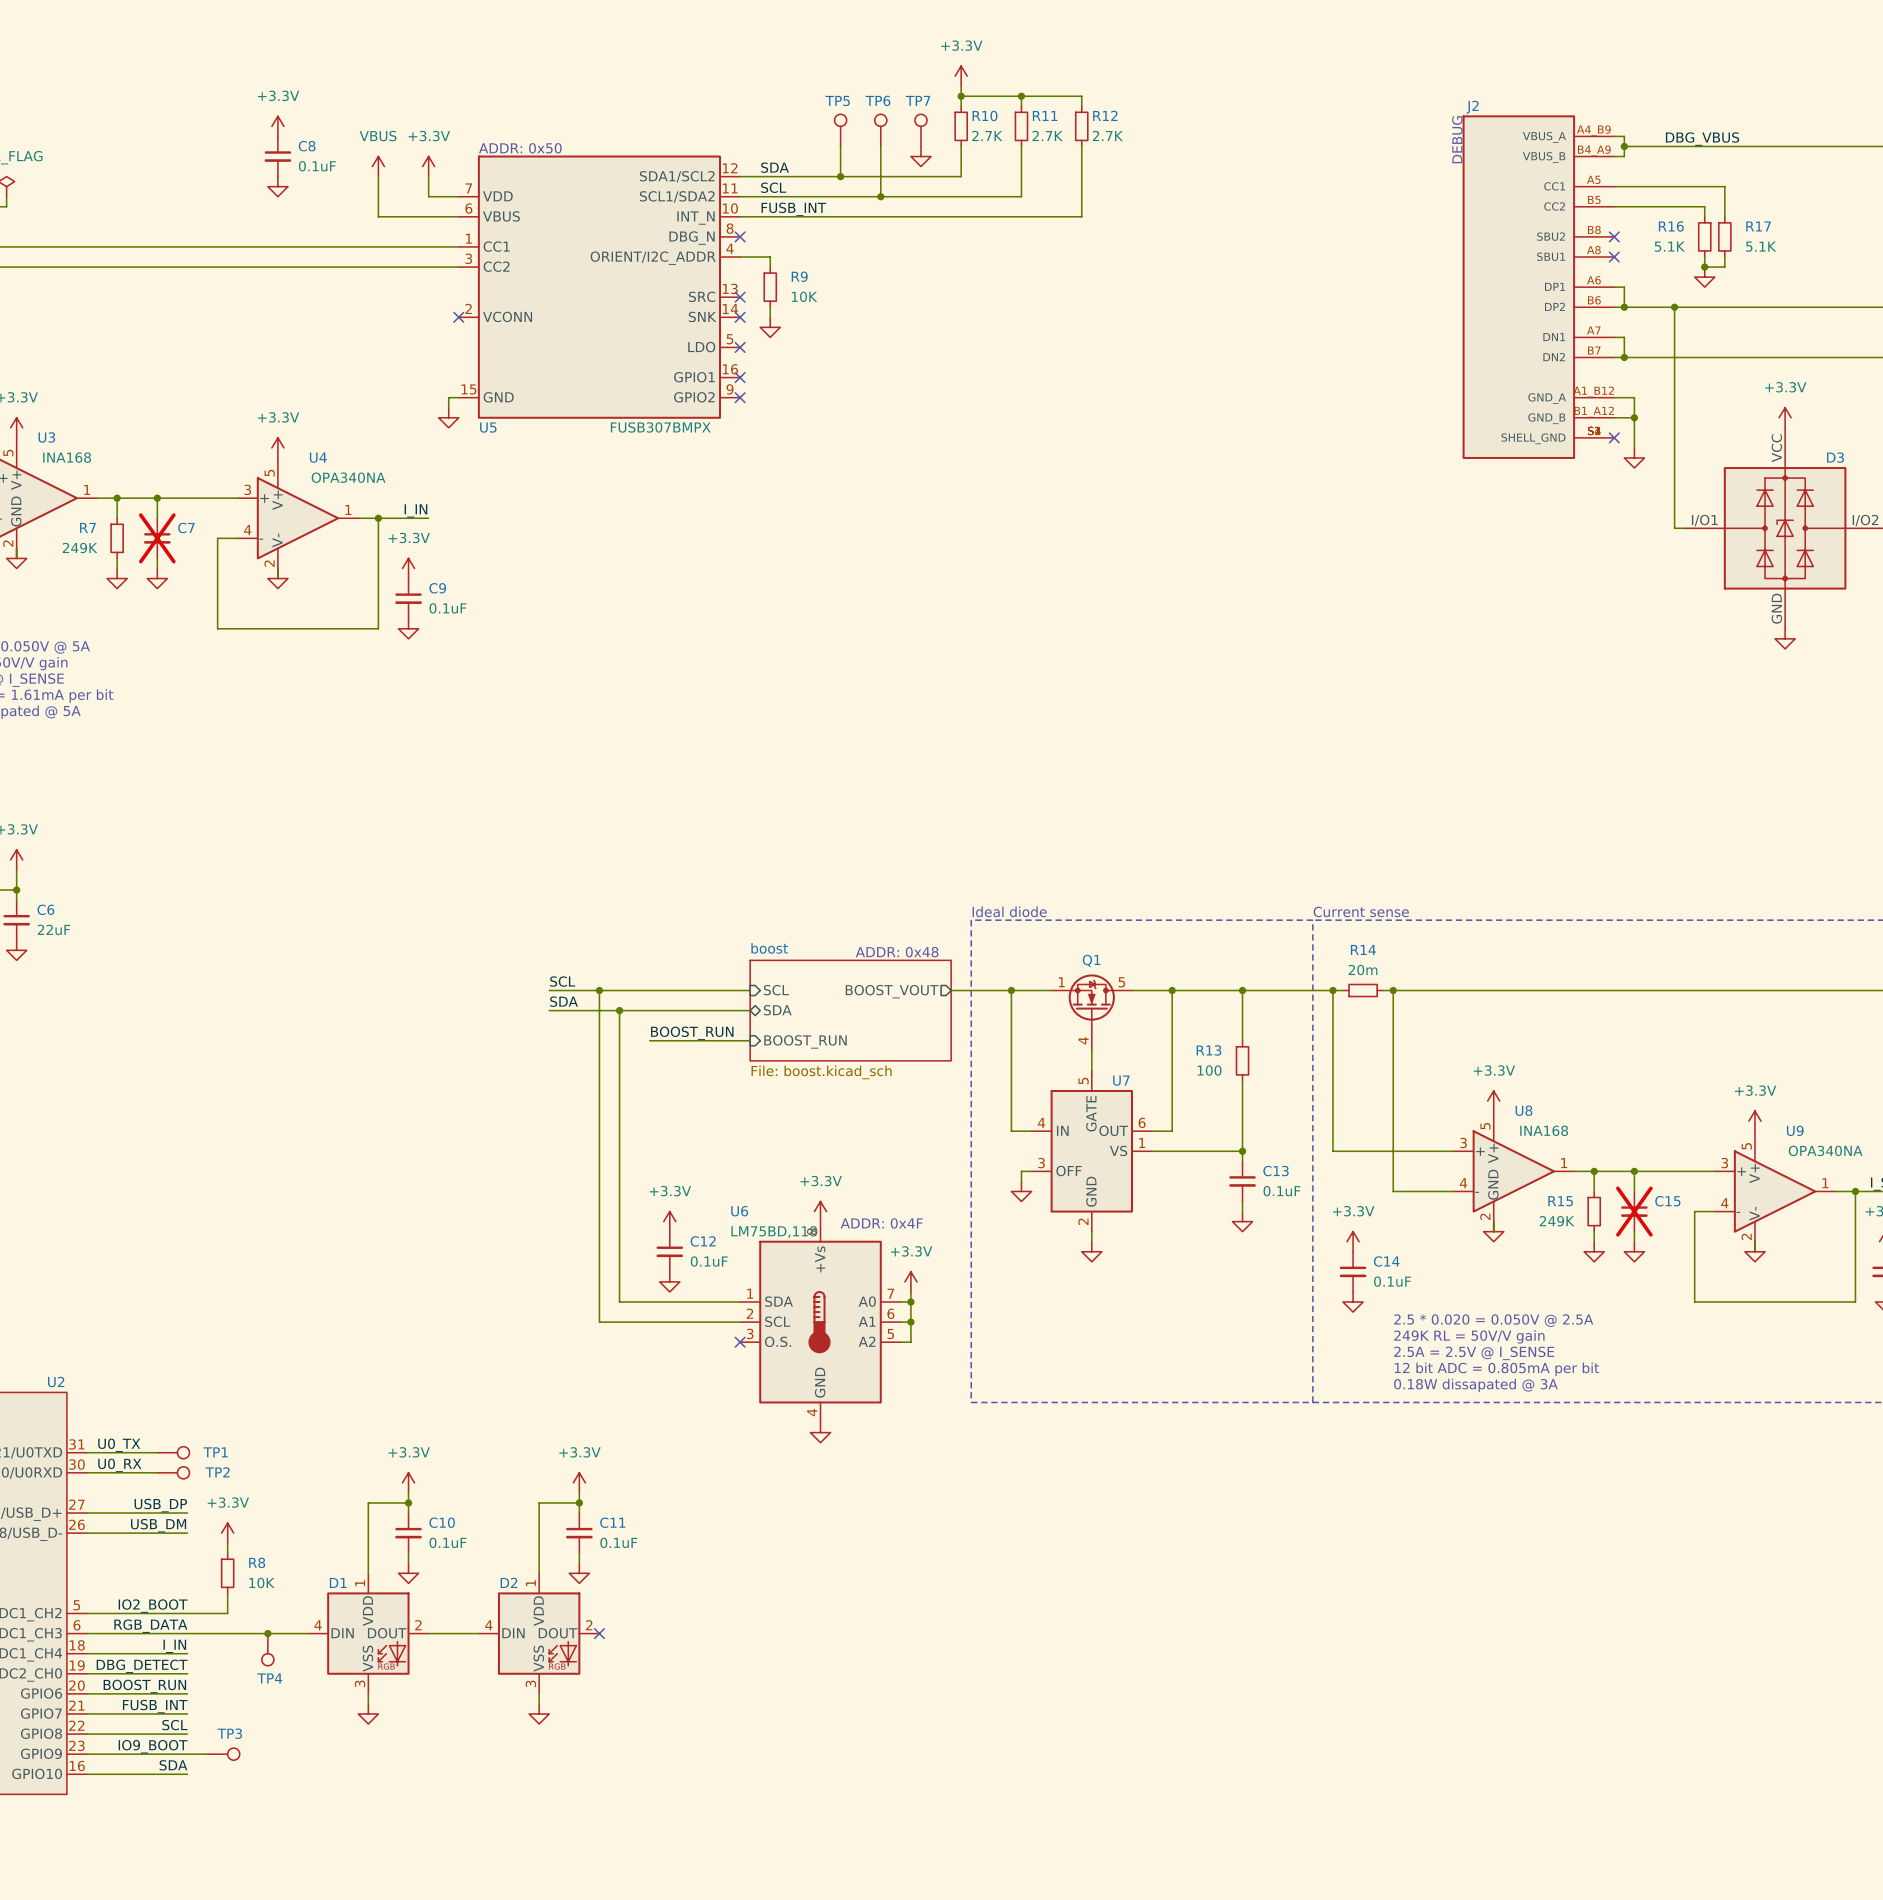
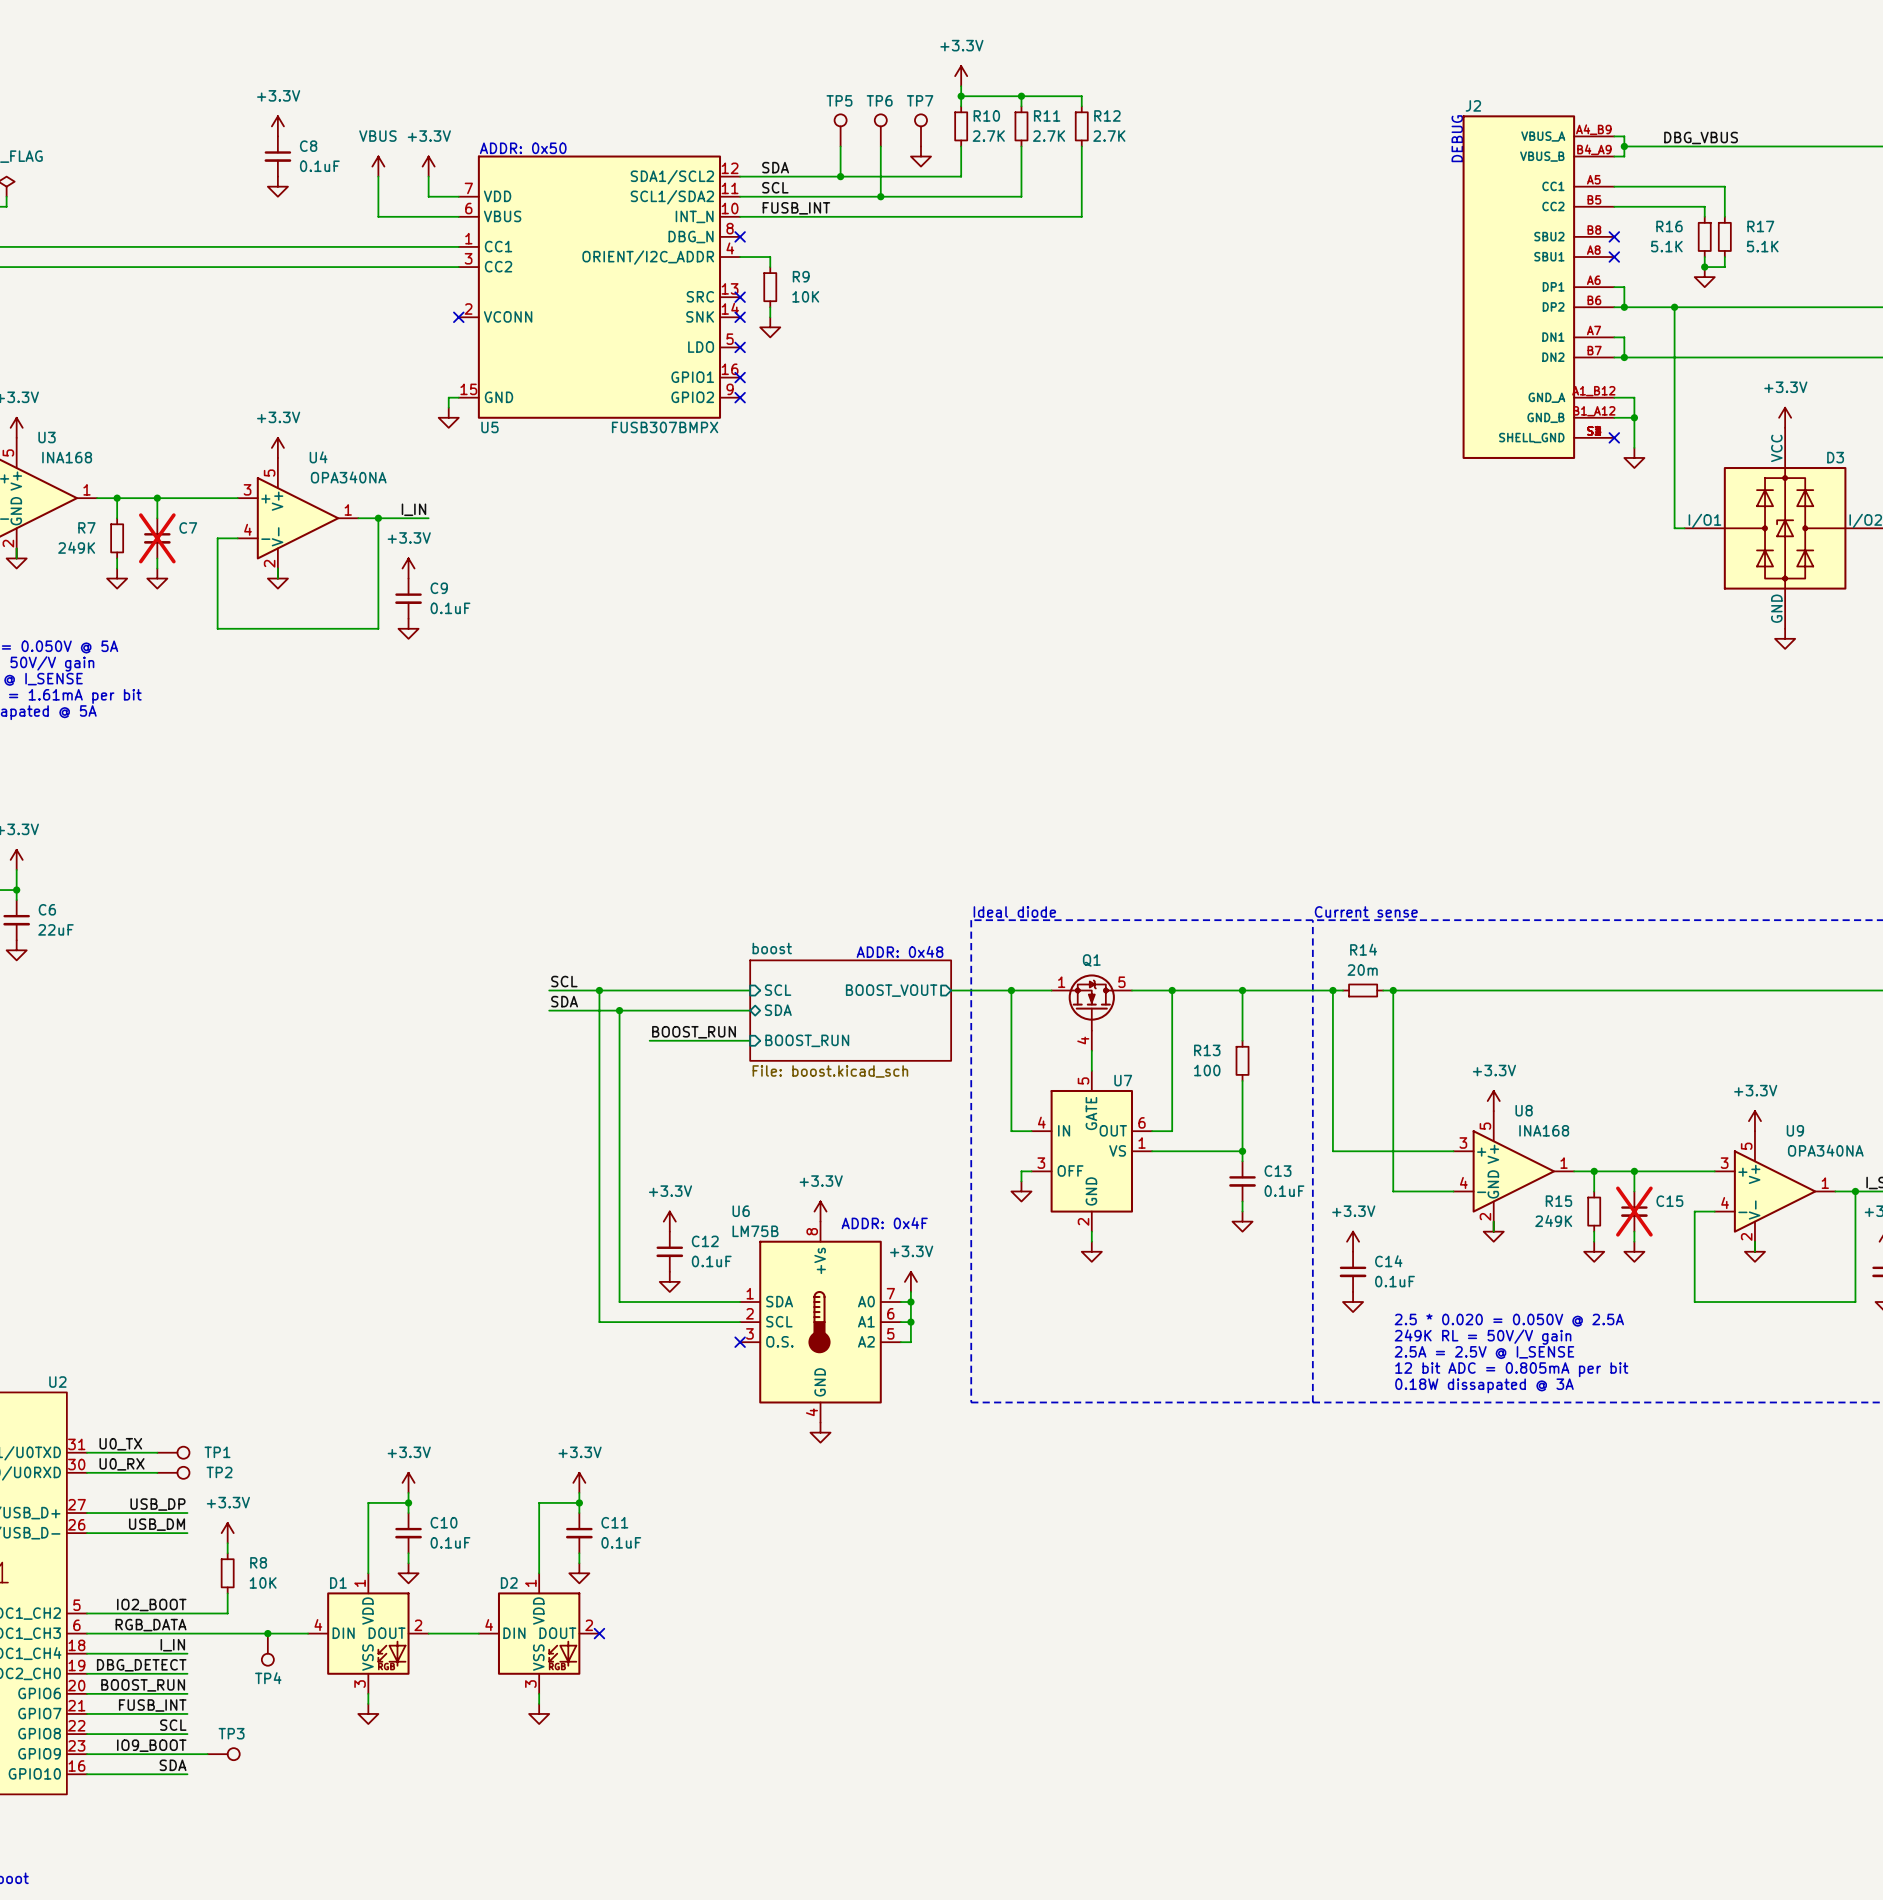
U6 value: LM75BD,118 (774, 1232) -> LM75B (755, 1231)

